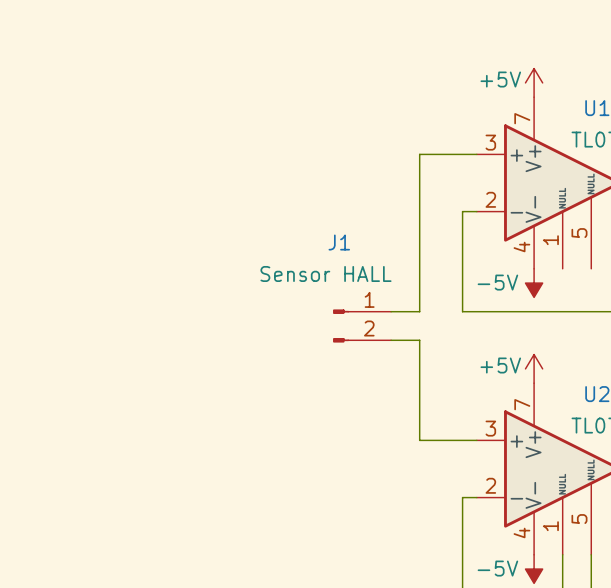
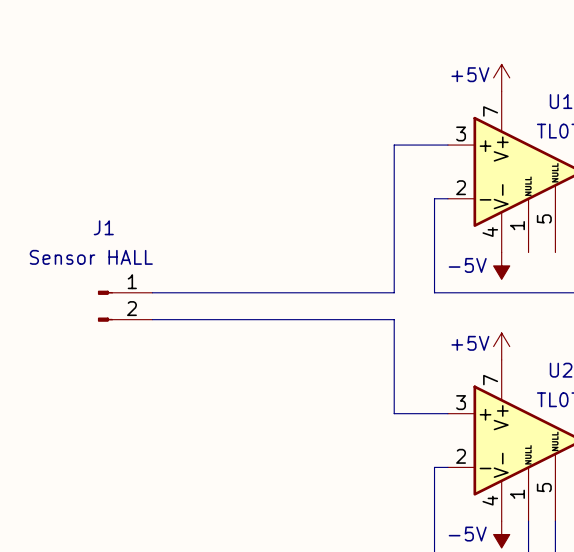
wire: none -> (152, 292) (367, 292)
J1 position: (362, 325) -> (125, 306)
wire: none -> (152, 319) (367, 319)

